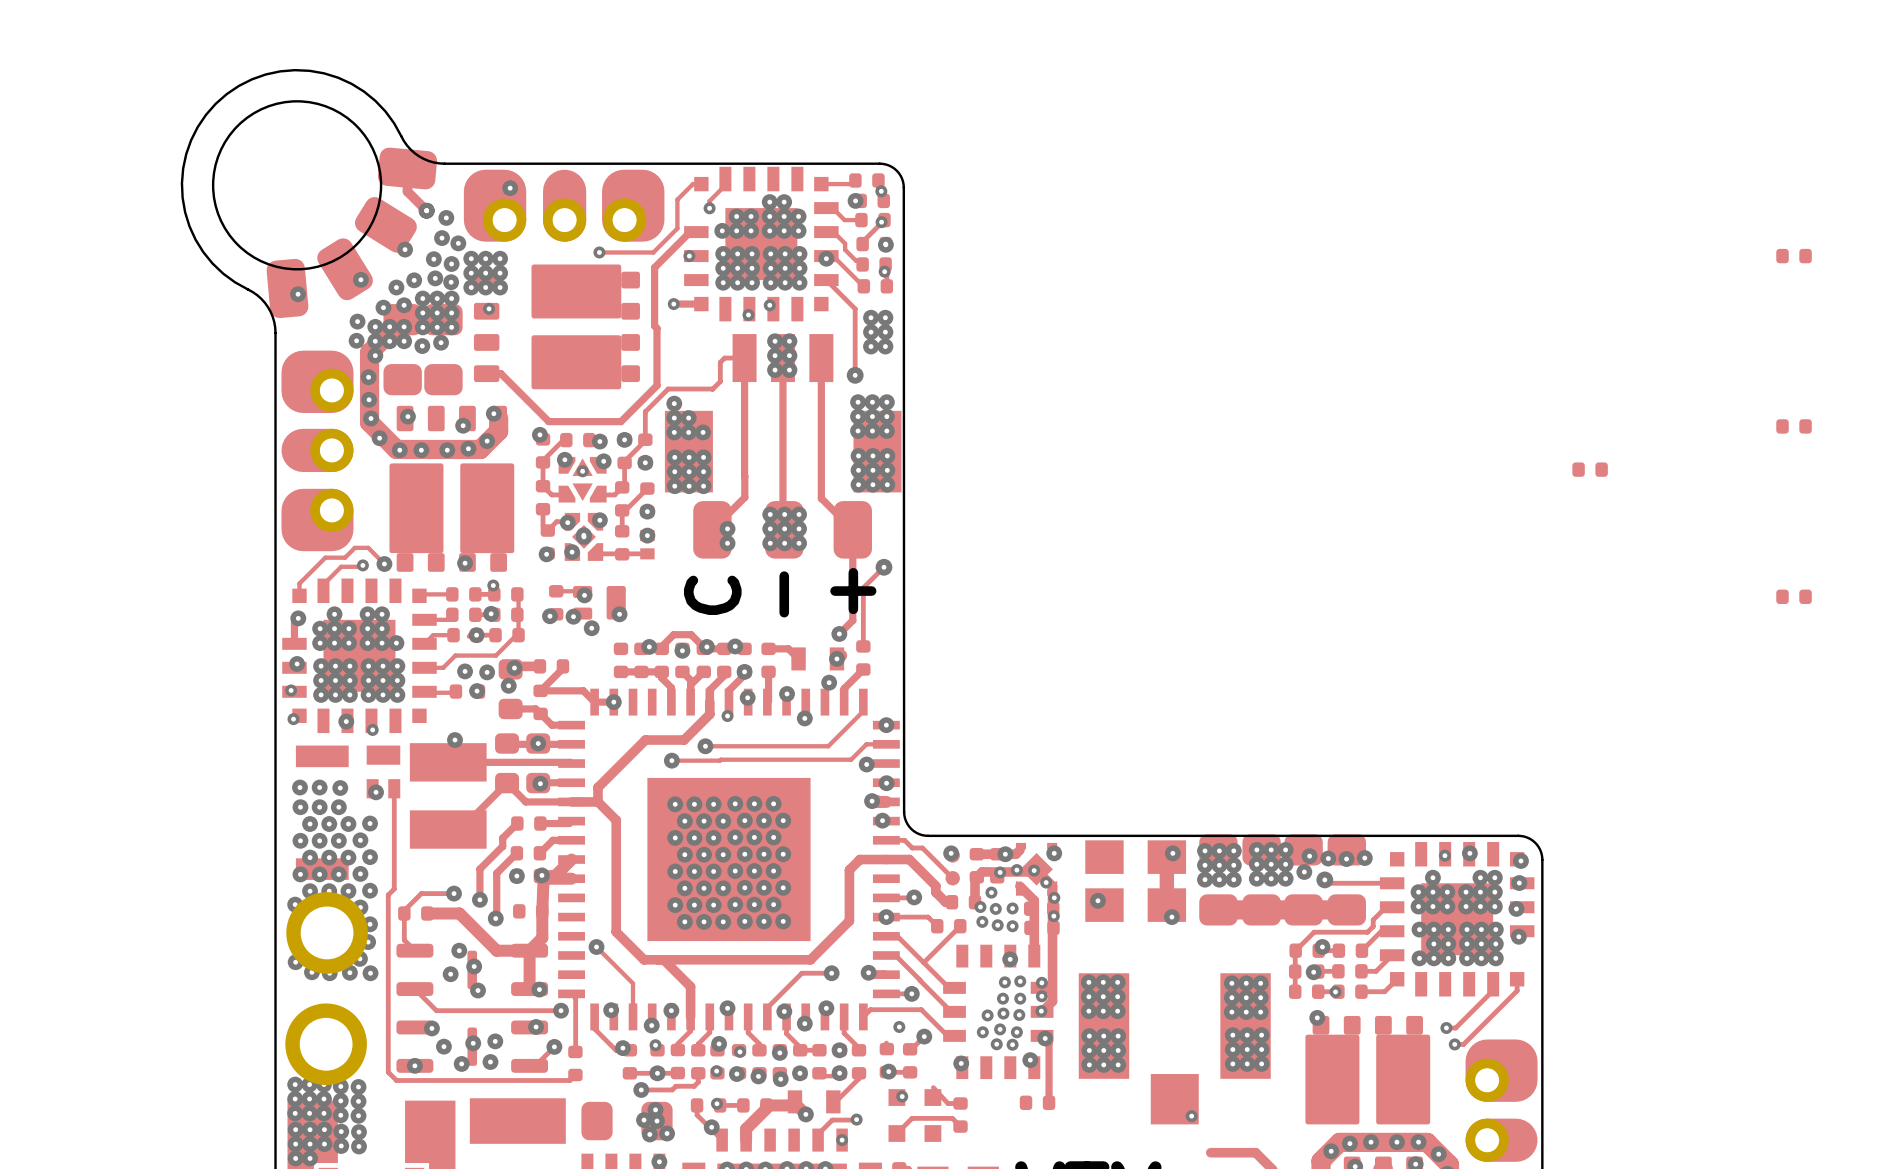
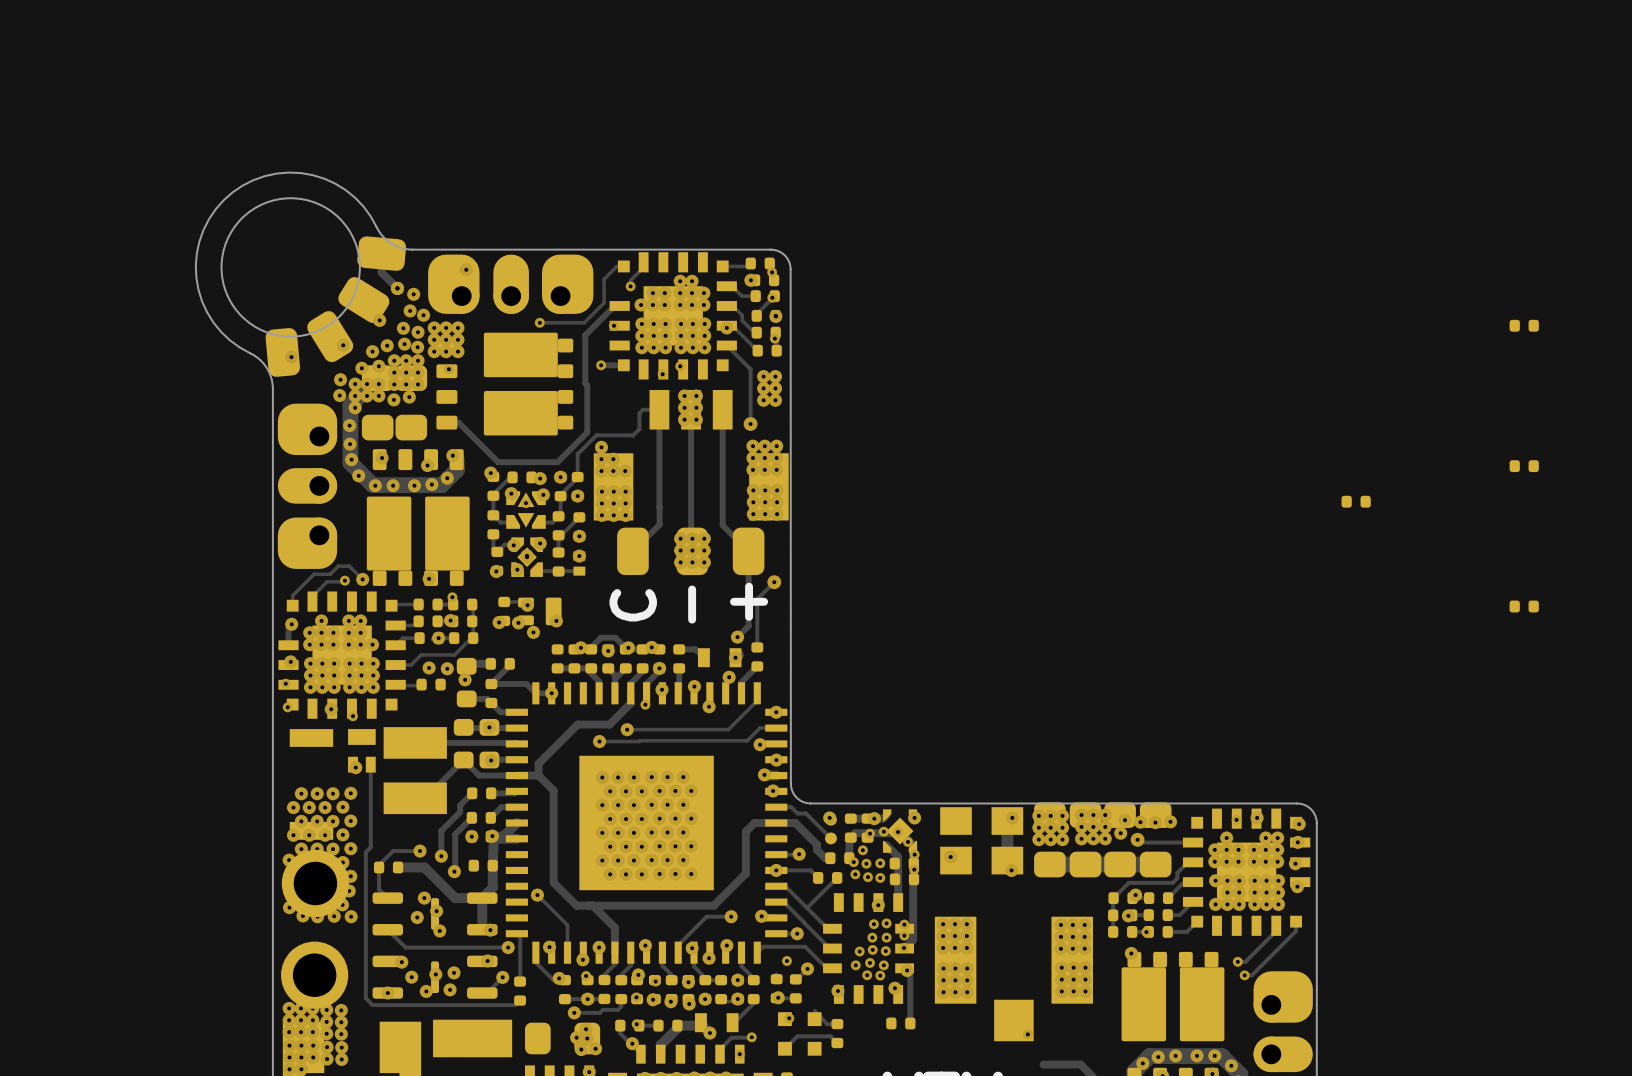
via: (727, 528) -> none
via: (727, 543) -> none
via: (514, 668) -> none
via: (477, 691) -> none
via: (454, 740) -> none
via: (299, 787) -> none
via: (319, 787) -> none
via: (340, 788) -> none
via: (300, 807) -> none
via: (319, 807) -> none
via: (338, 807) -> none

